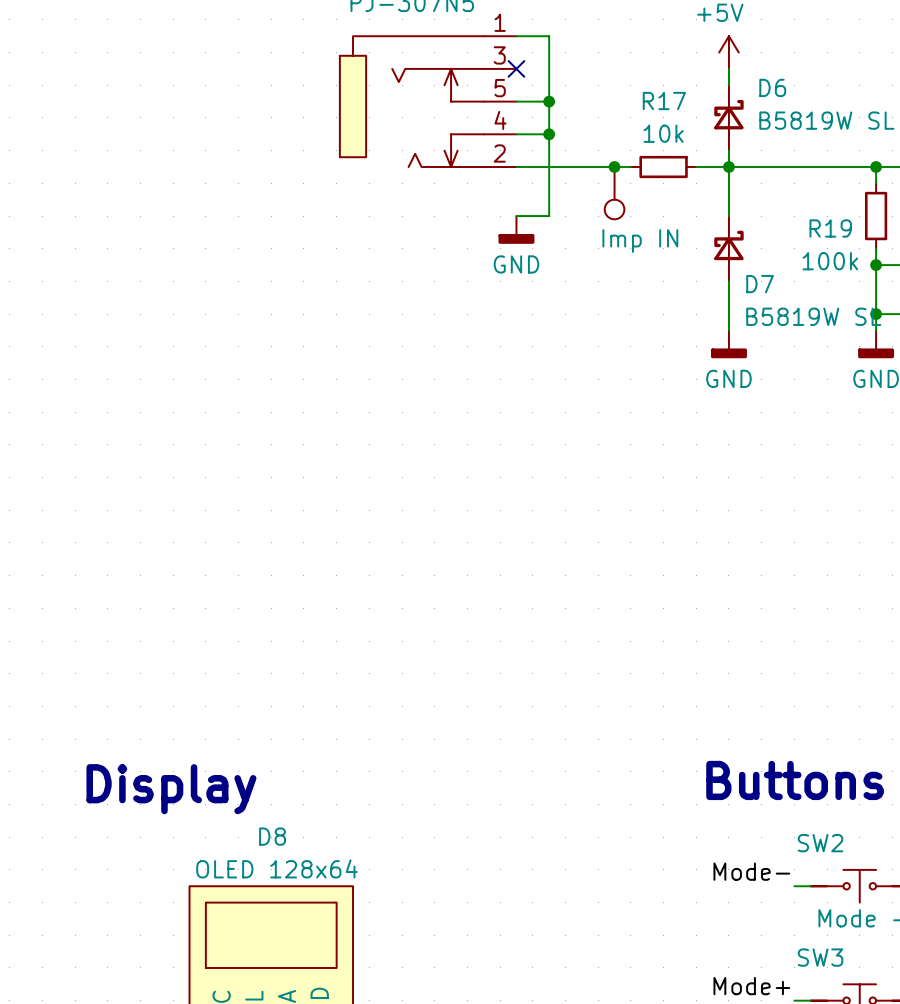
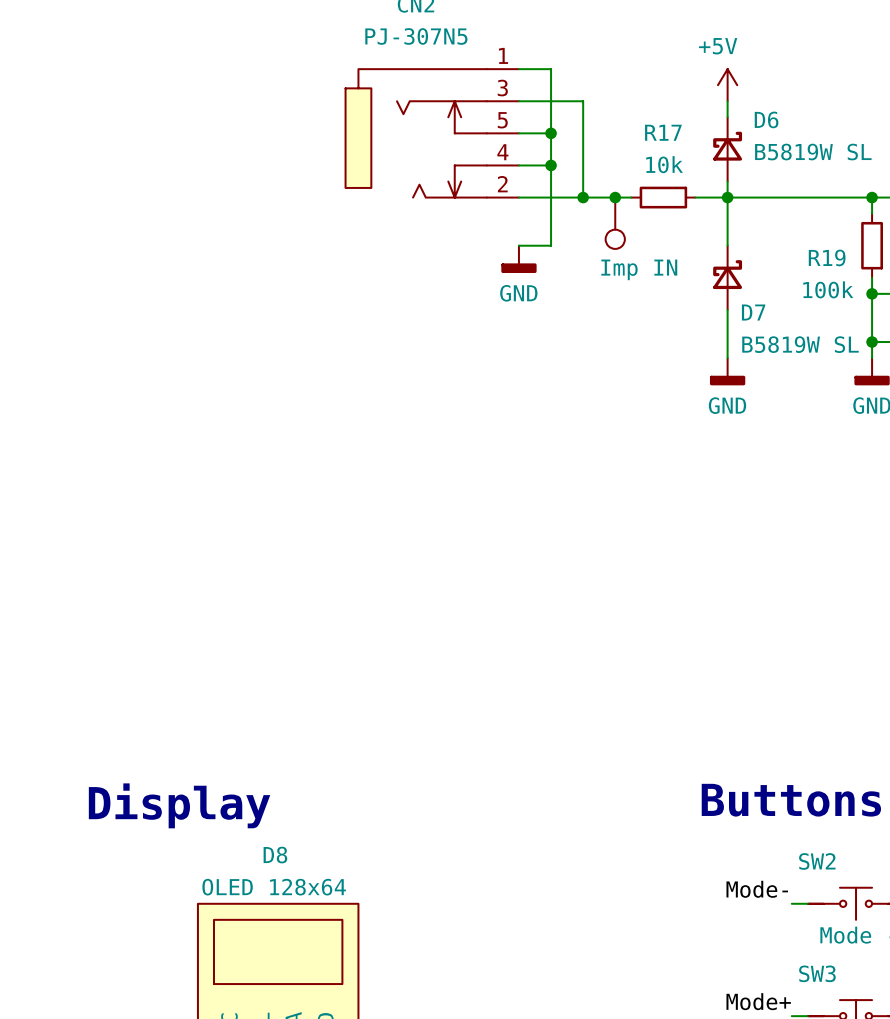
wire: none -> (518, 101) (583, 101) (583, 197)
no-connect mark: (516, 68) -> none
junction: none -> (583, 197)

